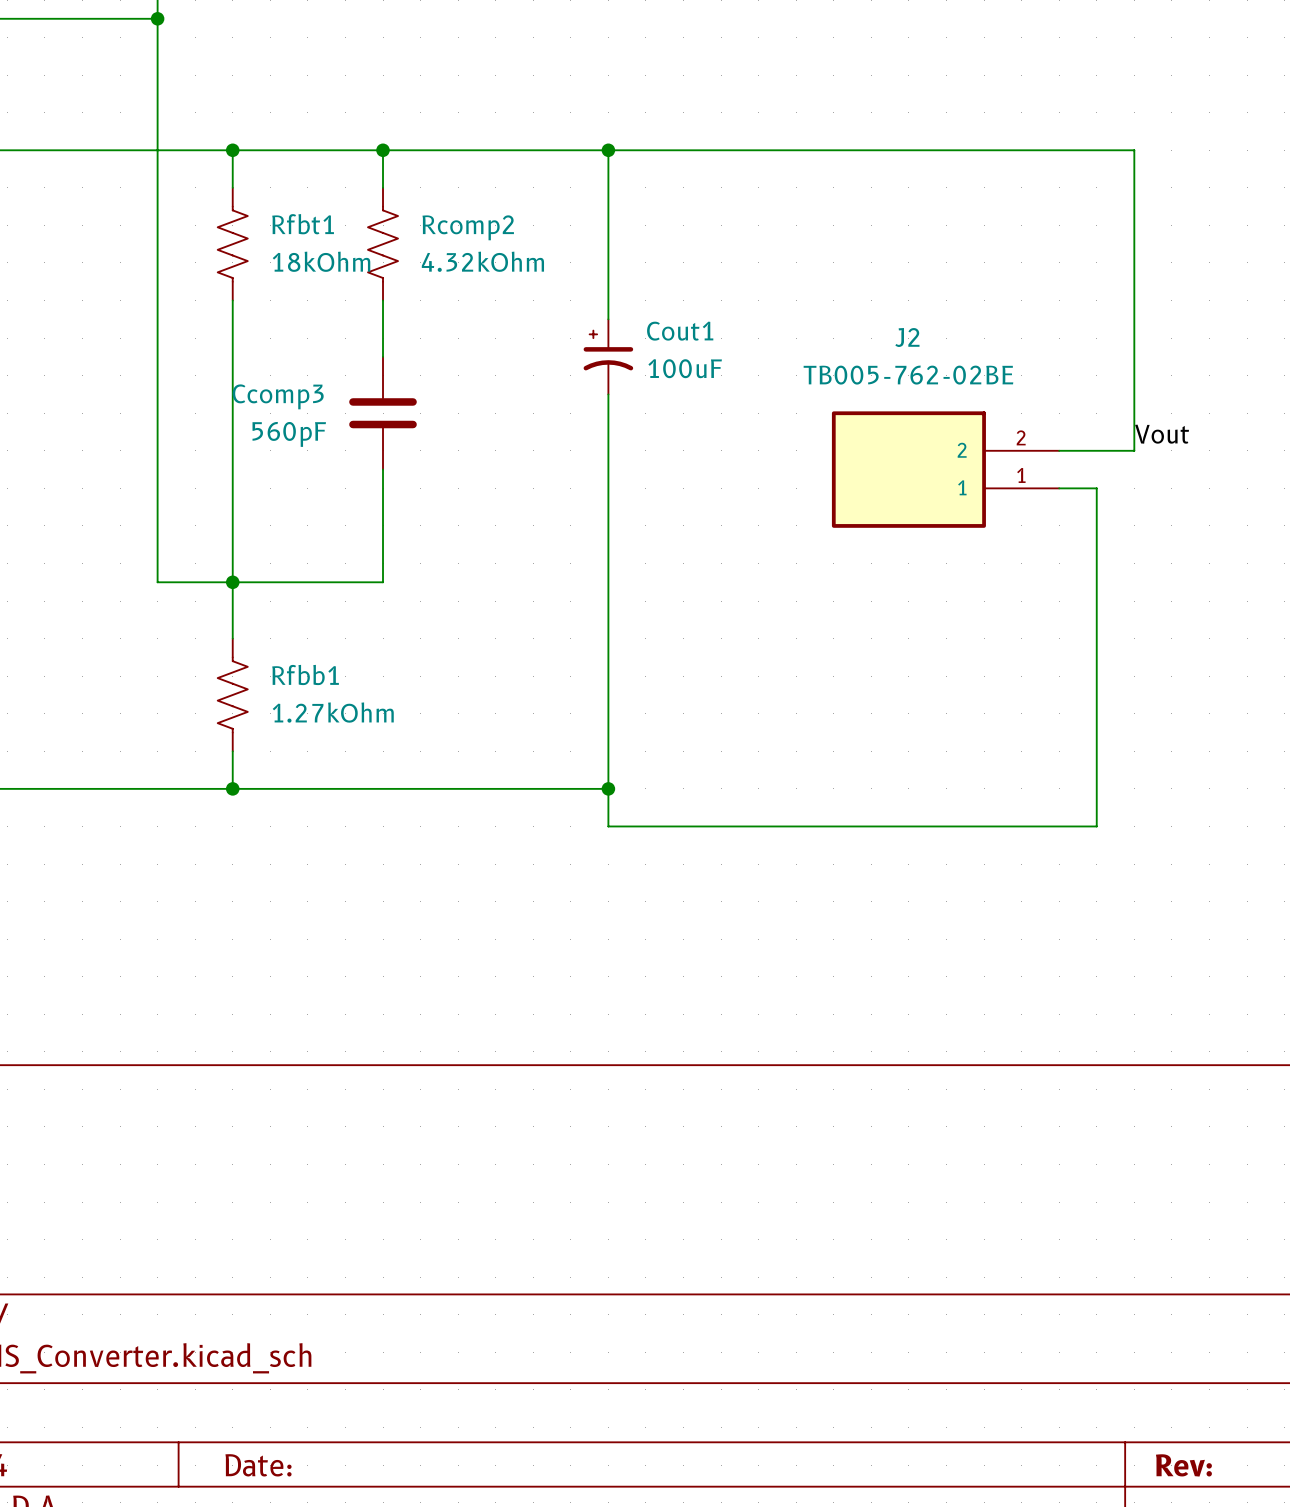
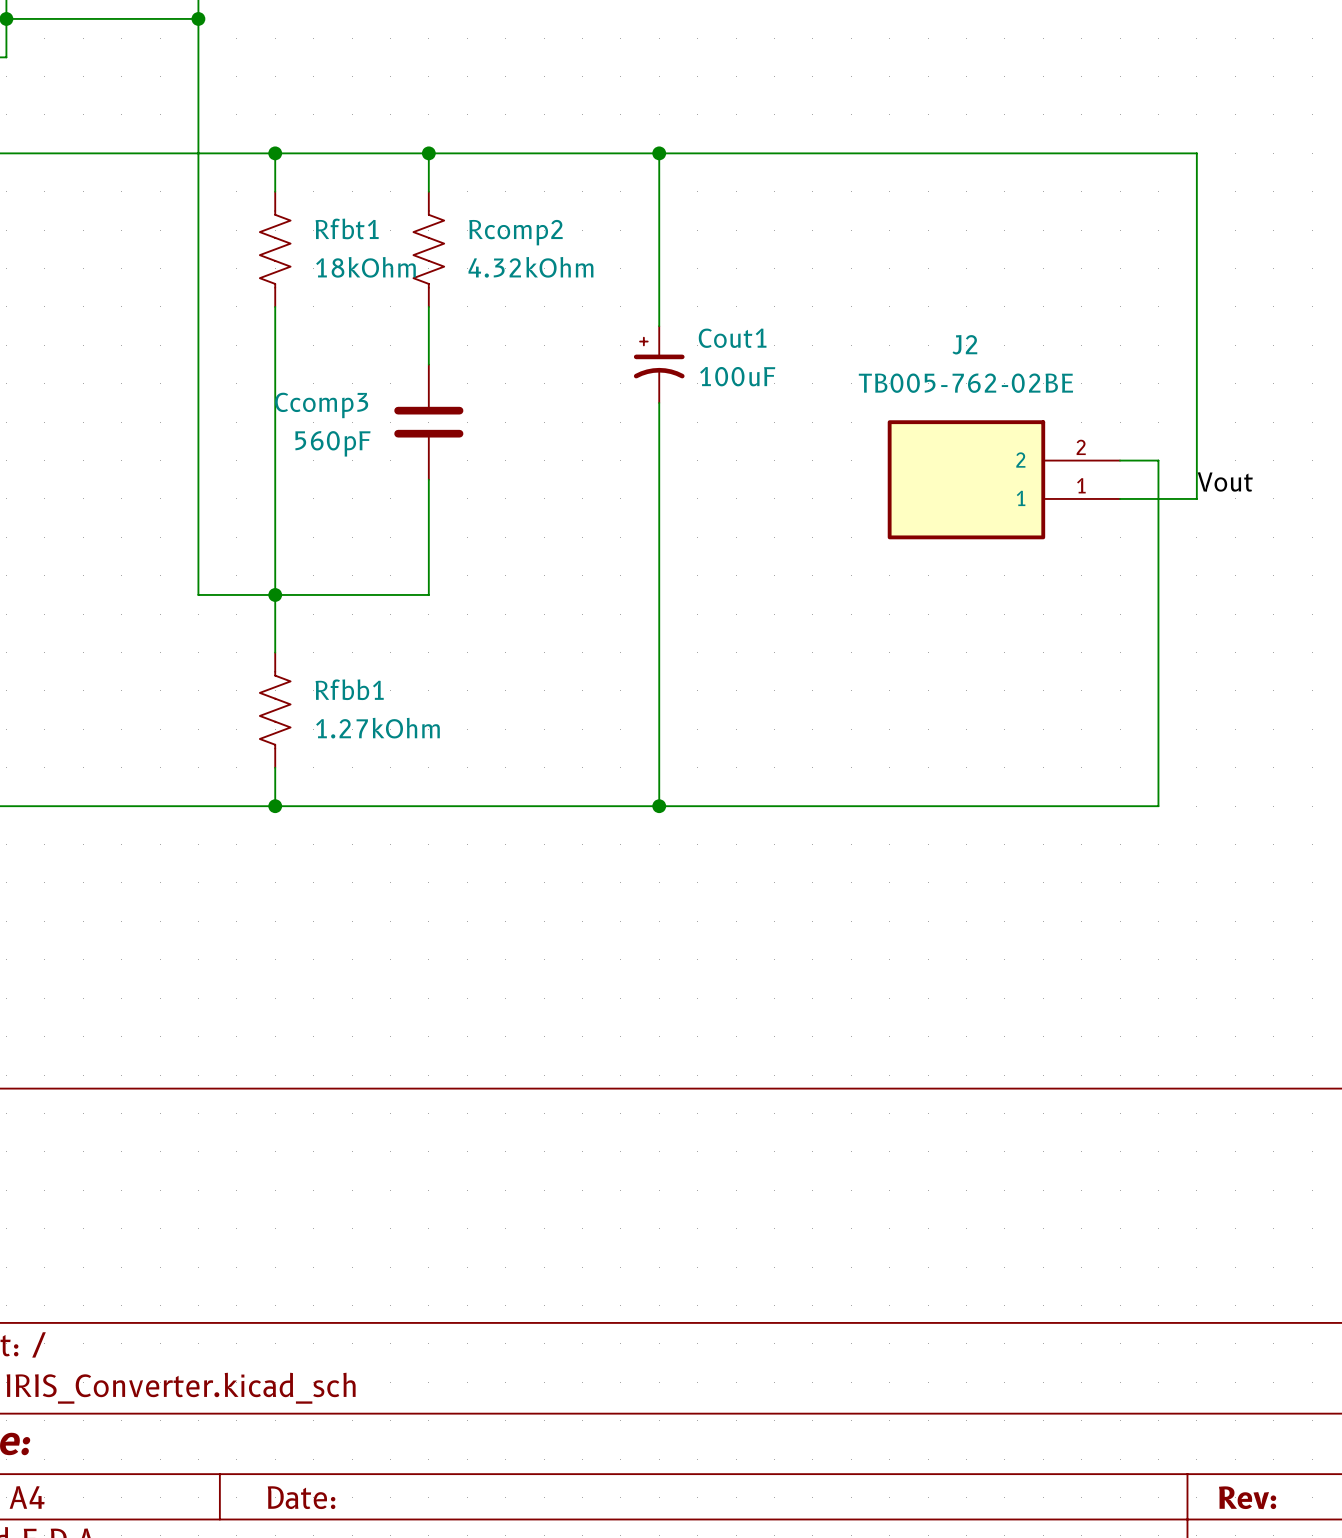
label position: Vout (1162, 434) -> Vout (1225, 481)
wire: (1096, 450) (1134, 450) -> (1158, 460) (1158, 498) (1196, 498) (1196, 460)
wire: (608, 788) (608, 826) (1096, 826) (1096, 788) -> (659, 806) (1158, 806)

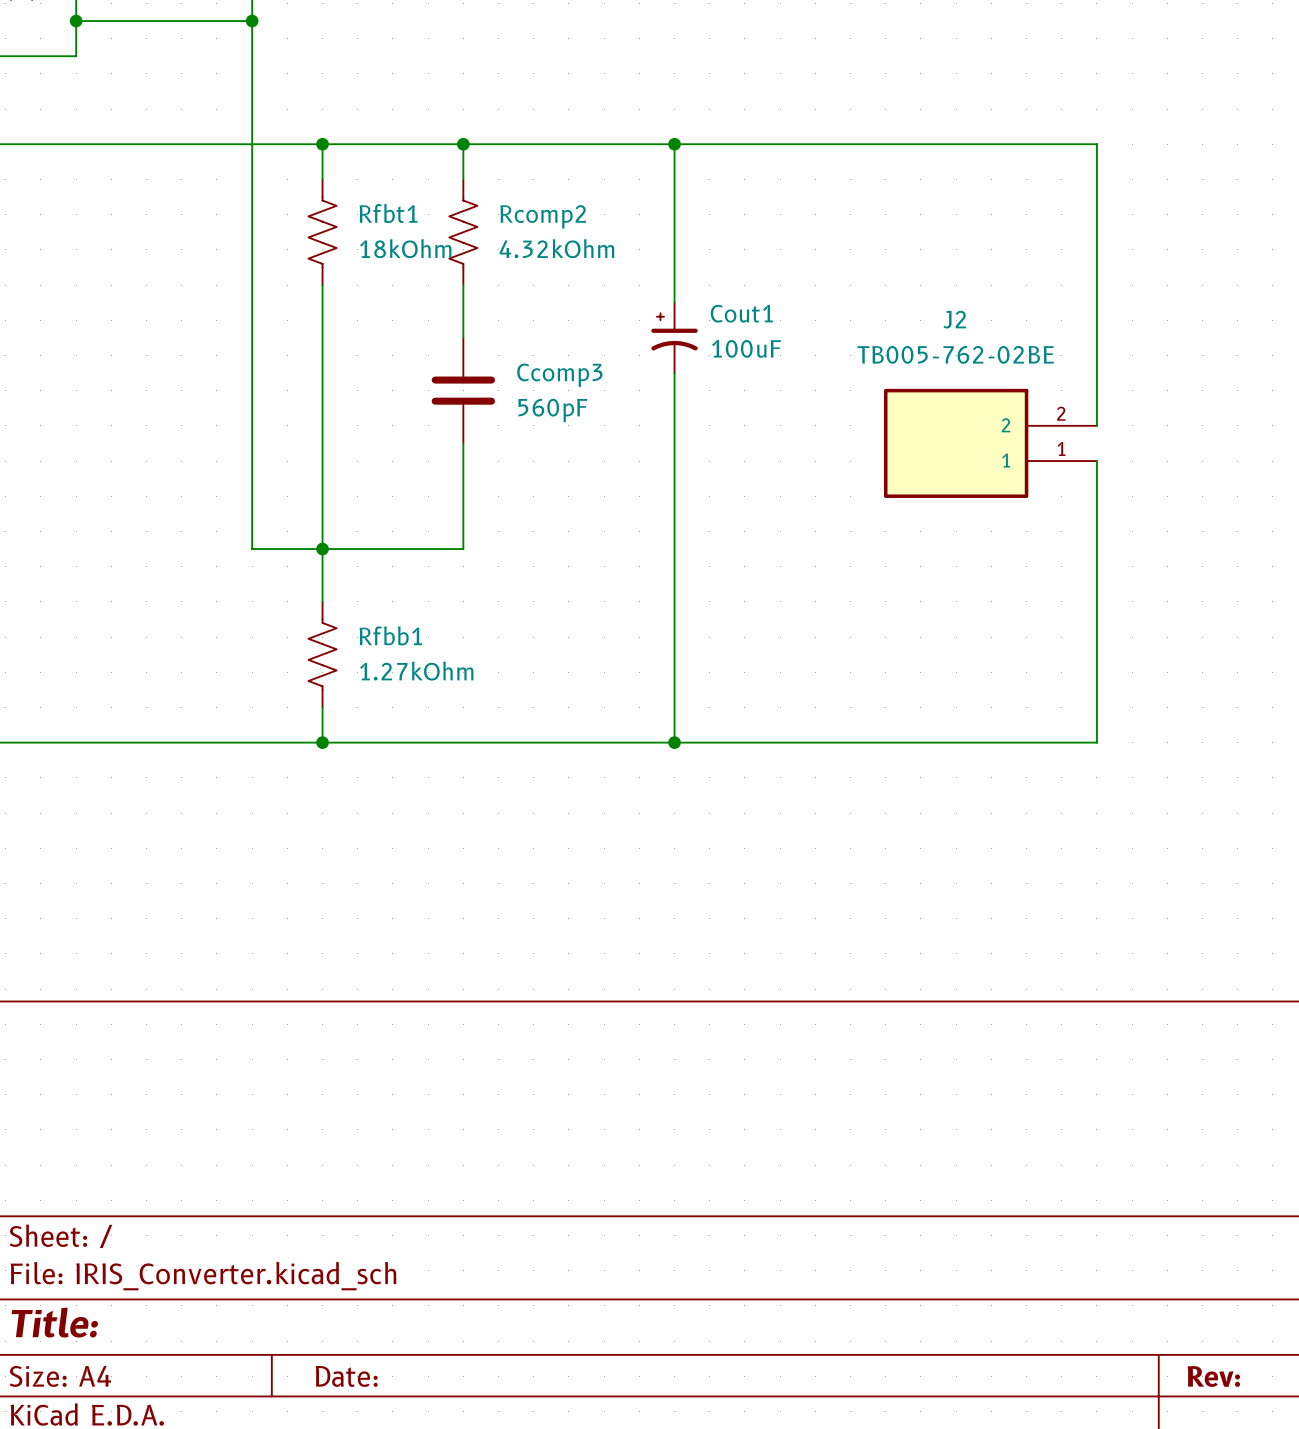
wire: (1120, 153) (1196, 153) (1196, 498) (1120, 498) -> (1096, 144) (1096, 425)
Ccomp3 name position: Ccomp3 (321, 405) -> Ccomp3 (559, 375)
Ccomp3 value position: 560pF (332, 443) -> 560pF (552, 410)
wire: (1120, 460) (1158, 460) (1158, 806) (1120, 806) -> (1096, 461) (1096, 742)
label: Vout (1225, 481) -> none

